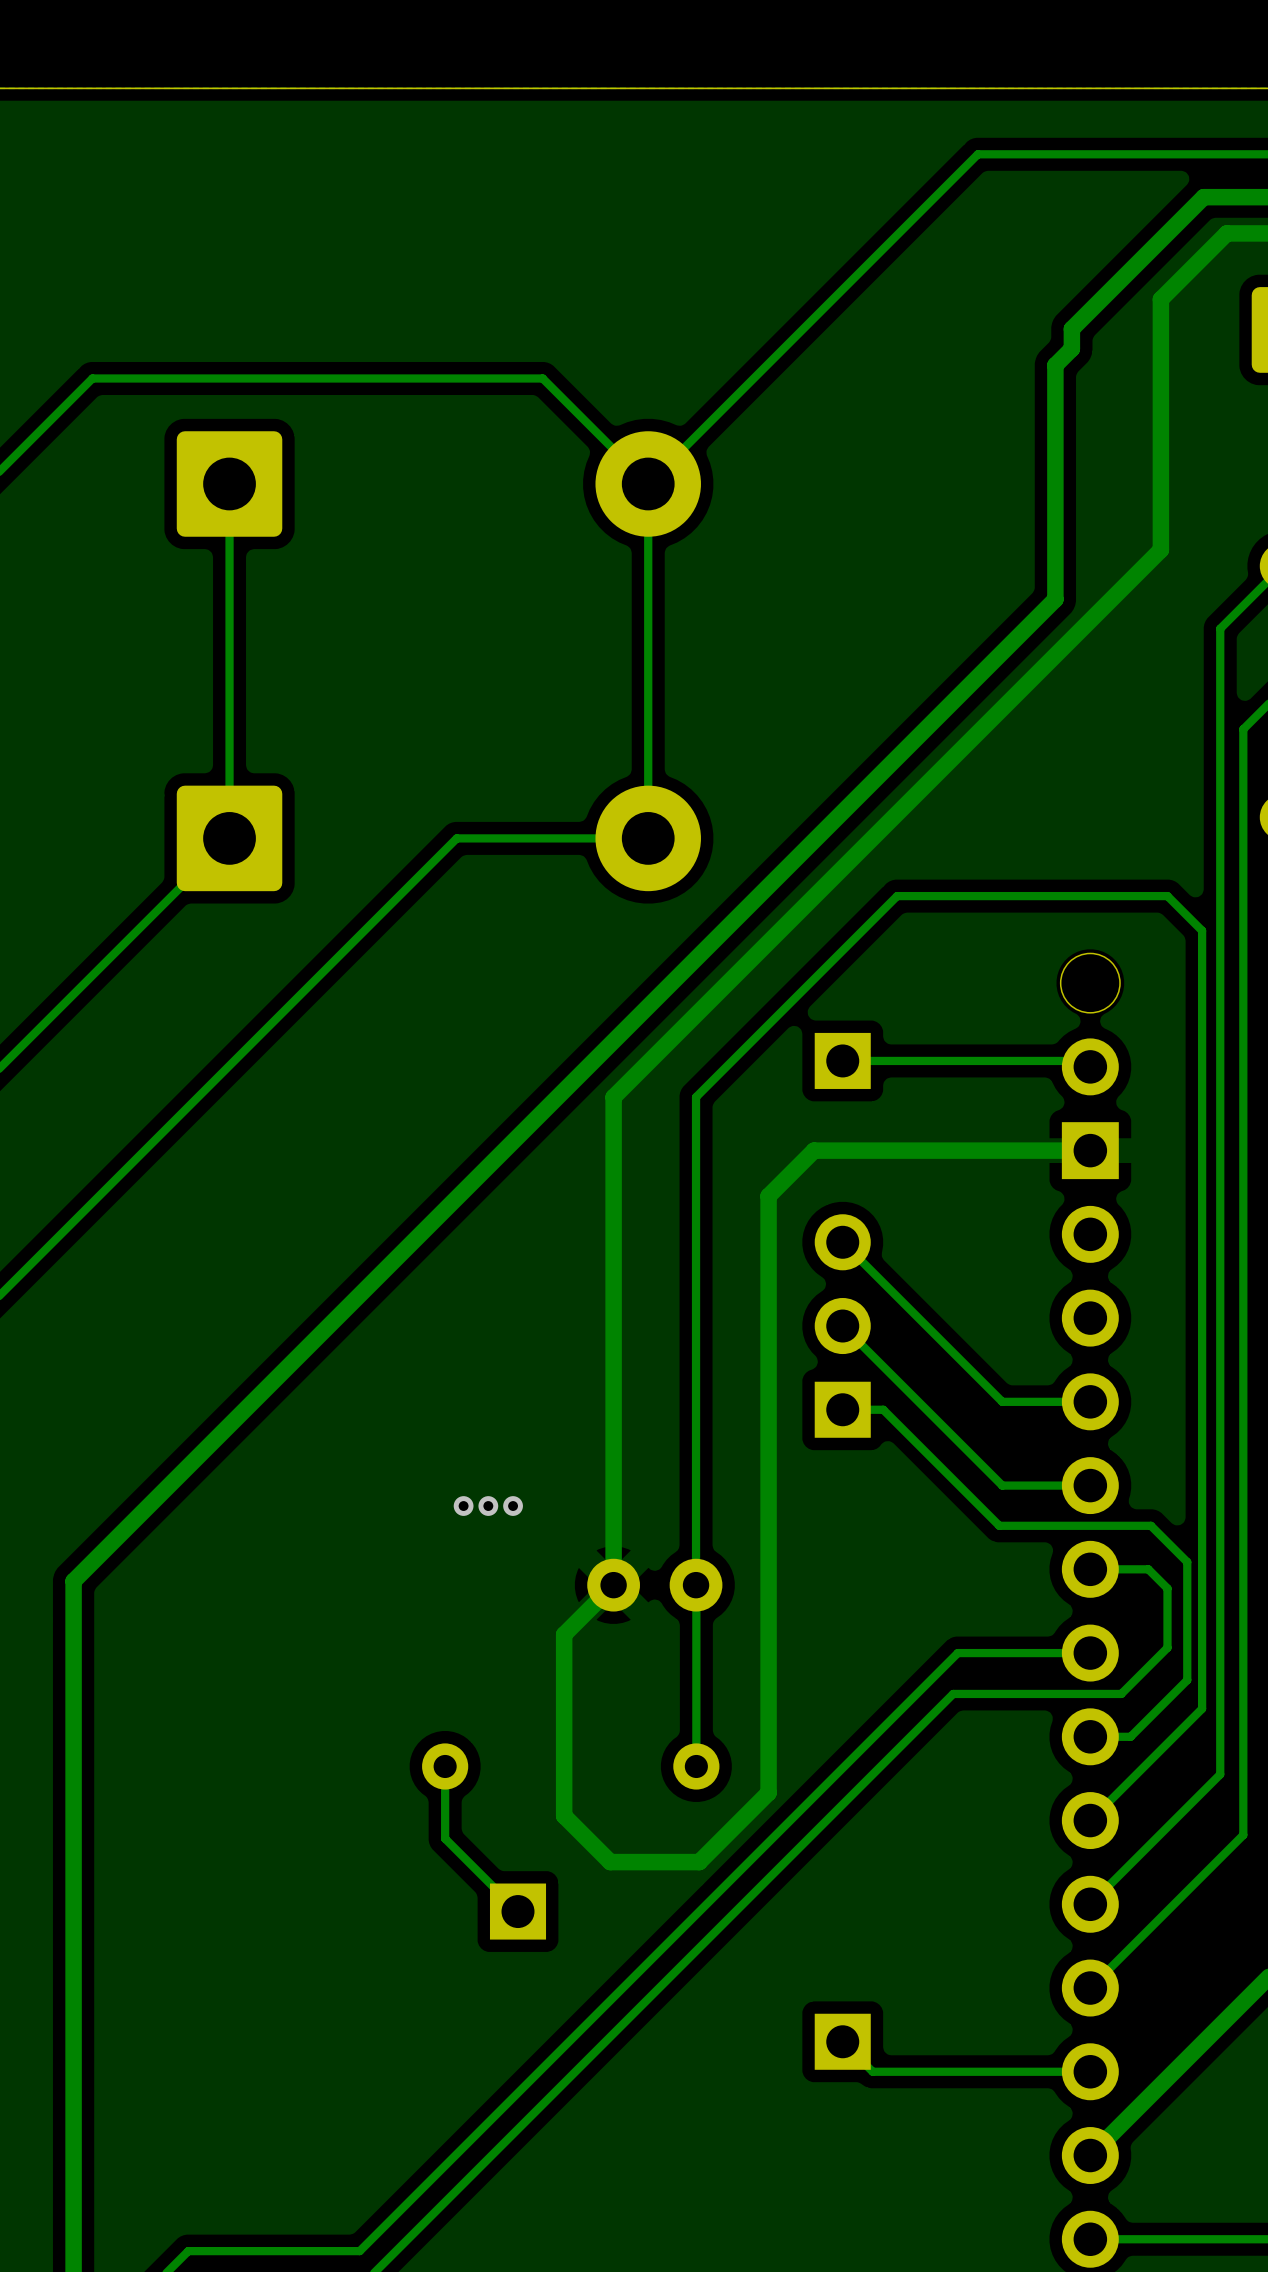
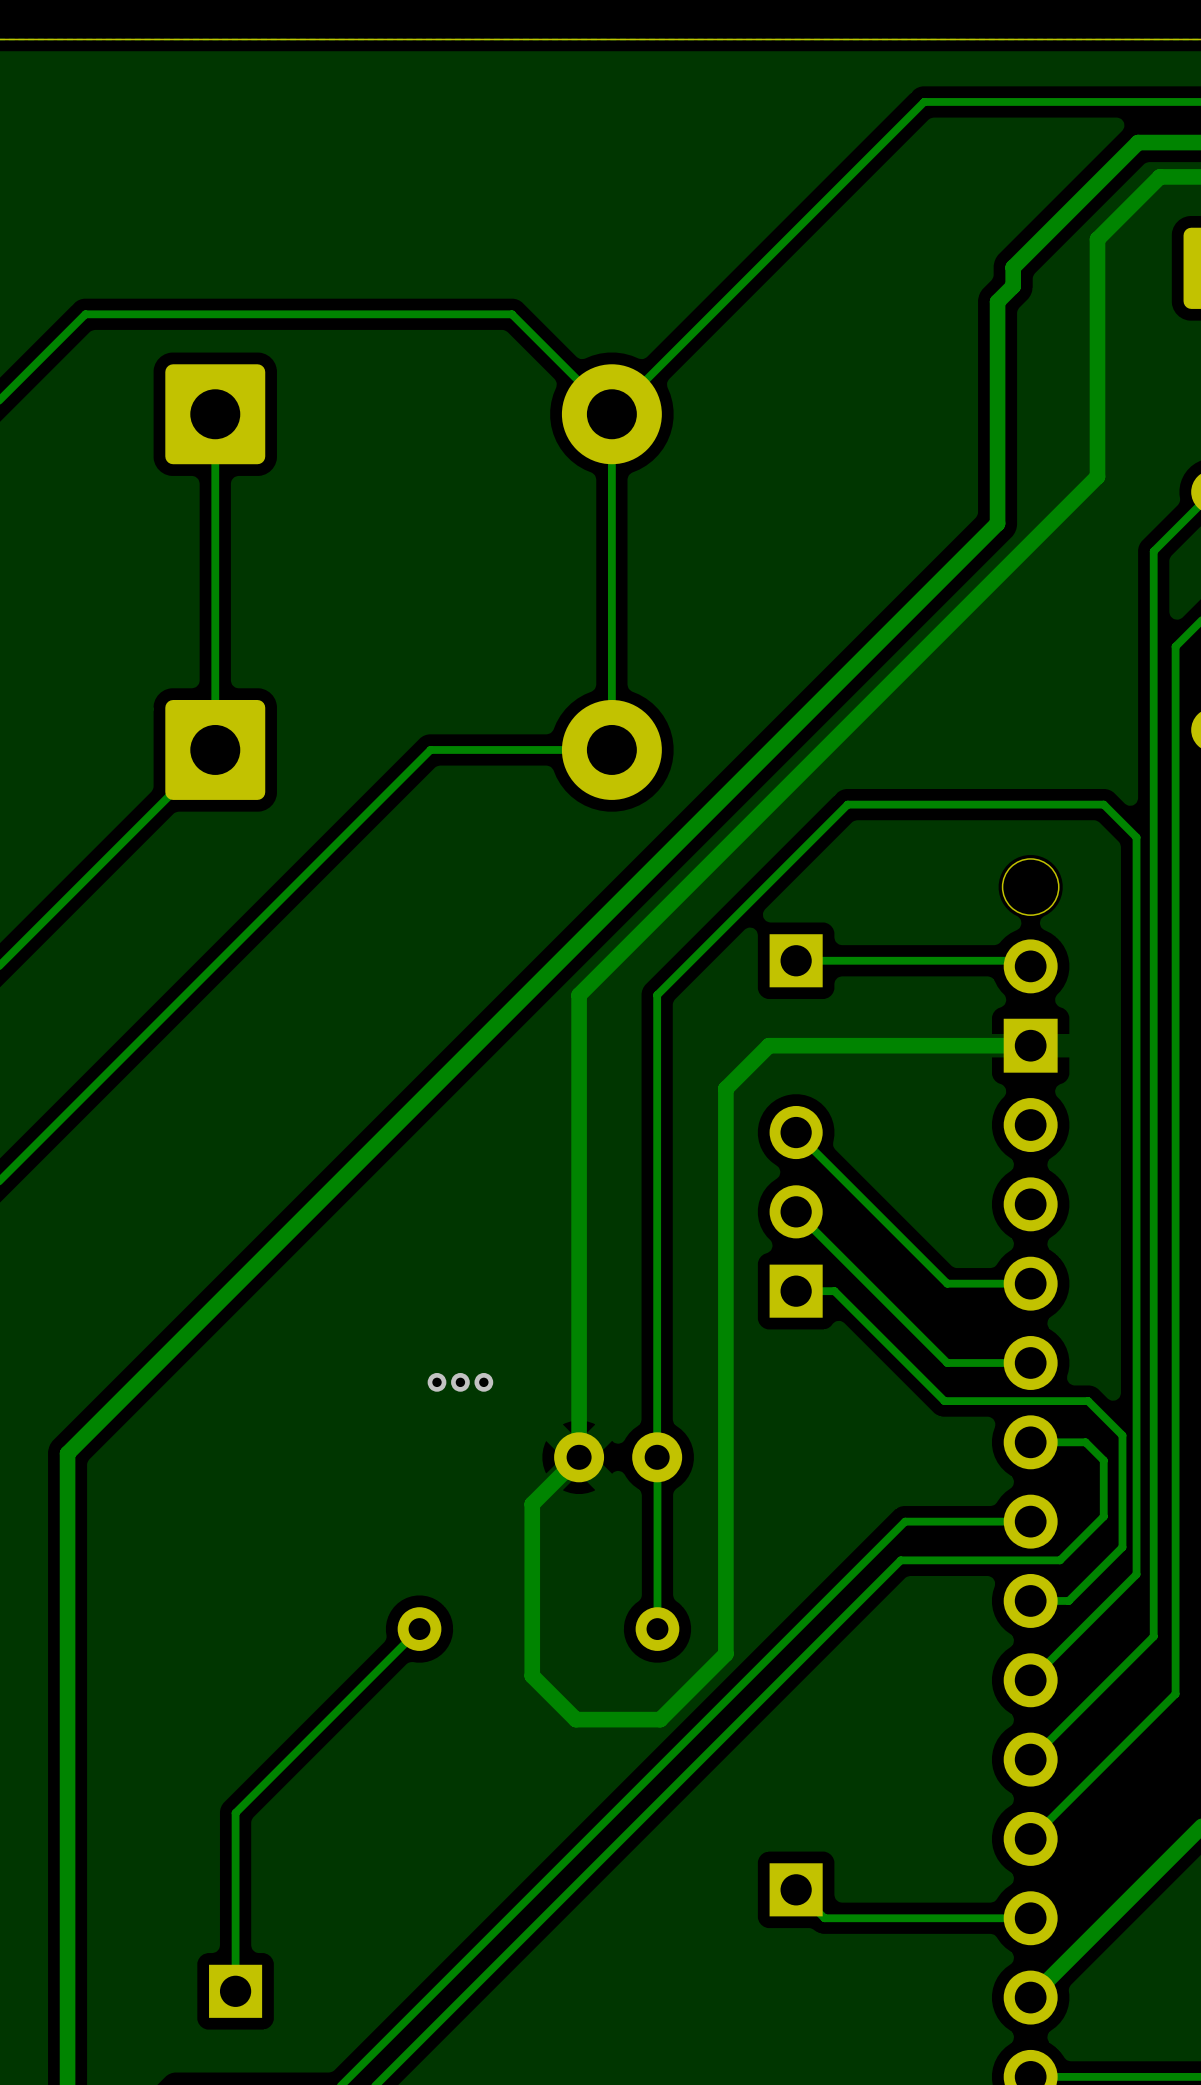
track: (445, 1766) (445, 1838) (518, 1911) -> (419, 1629) (235, 1813) (235, 1991)
part position: (518, 1911) -> (235, 1991)

